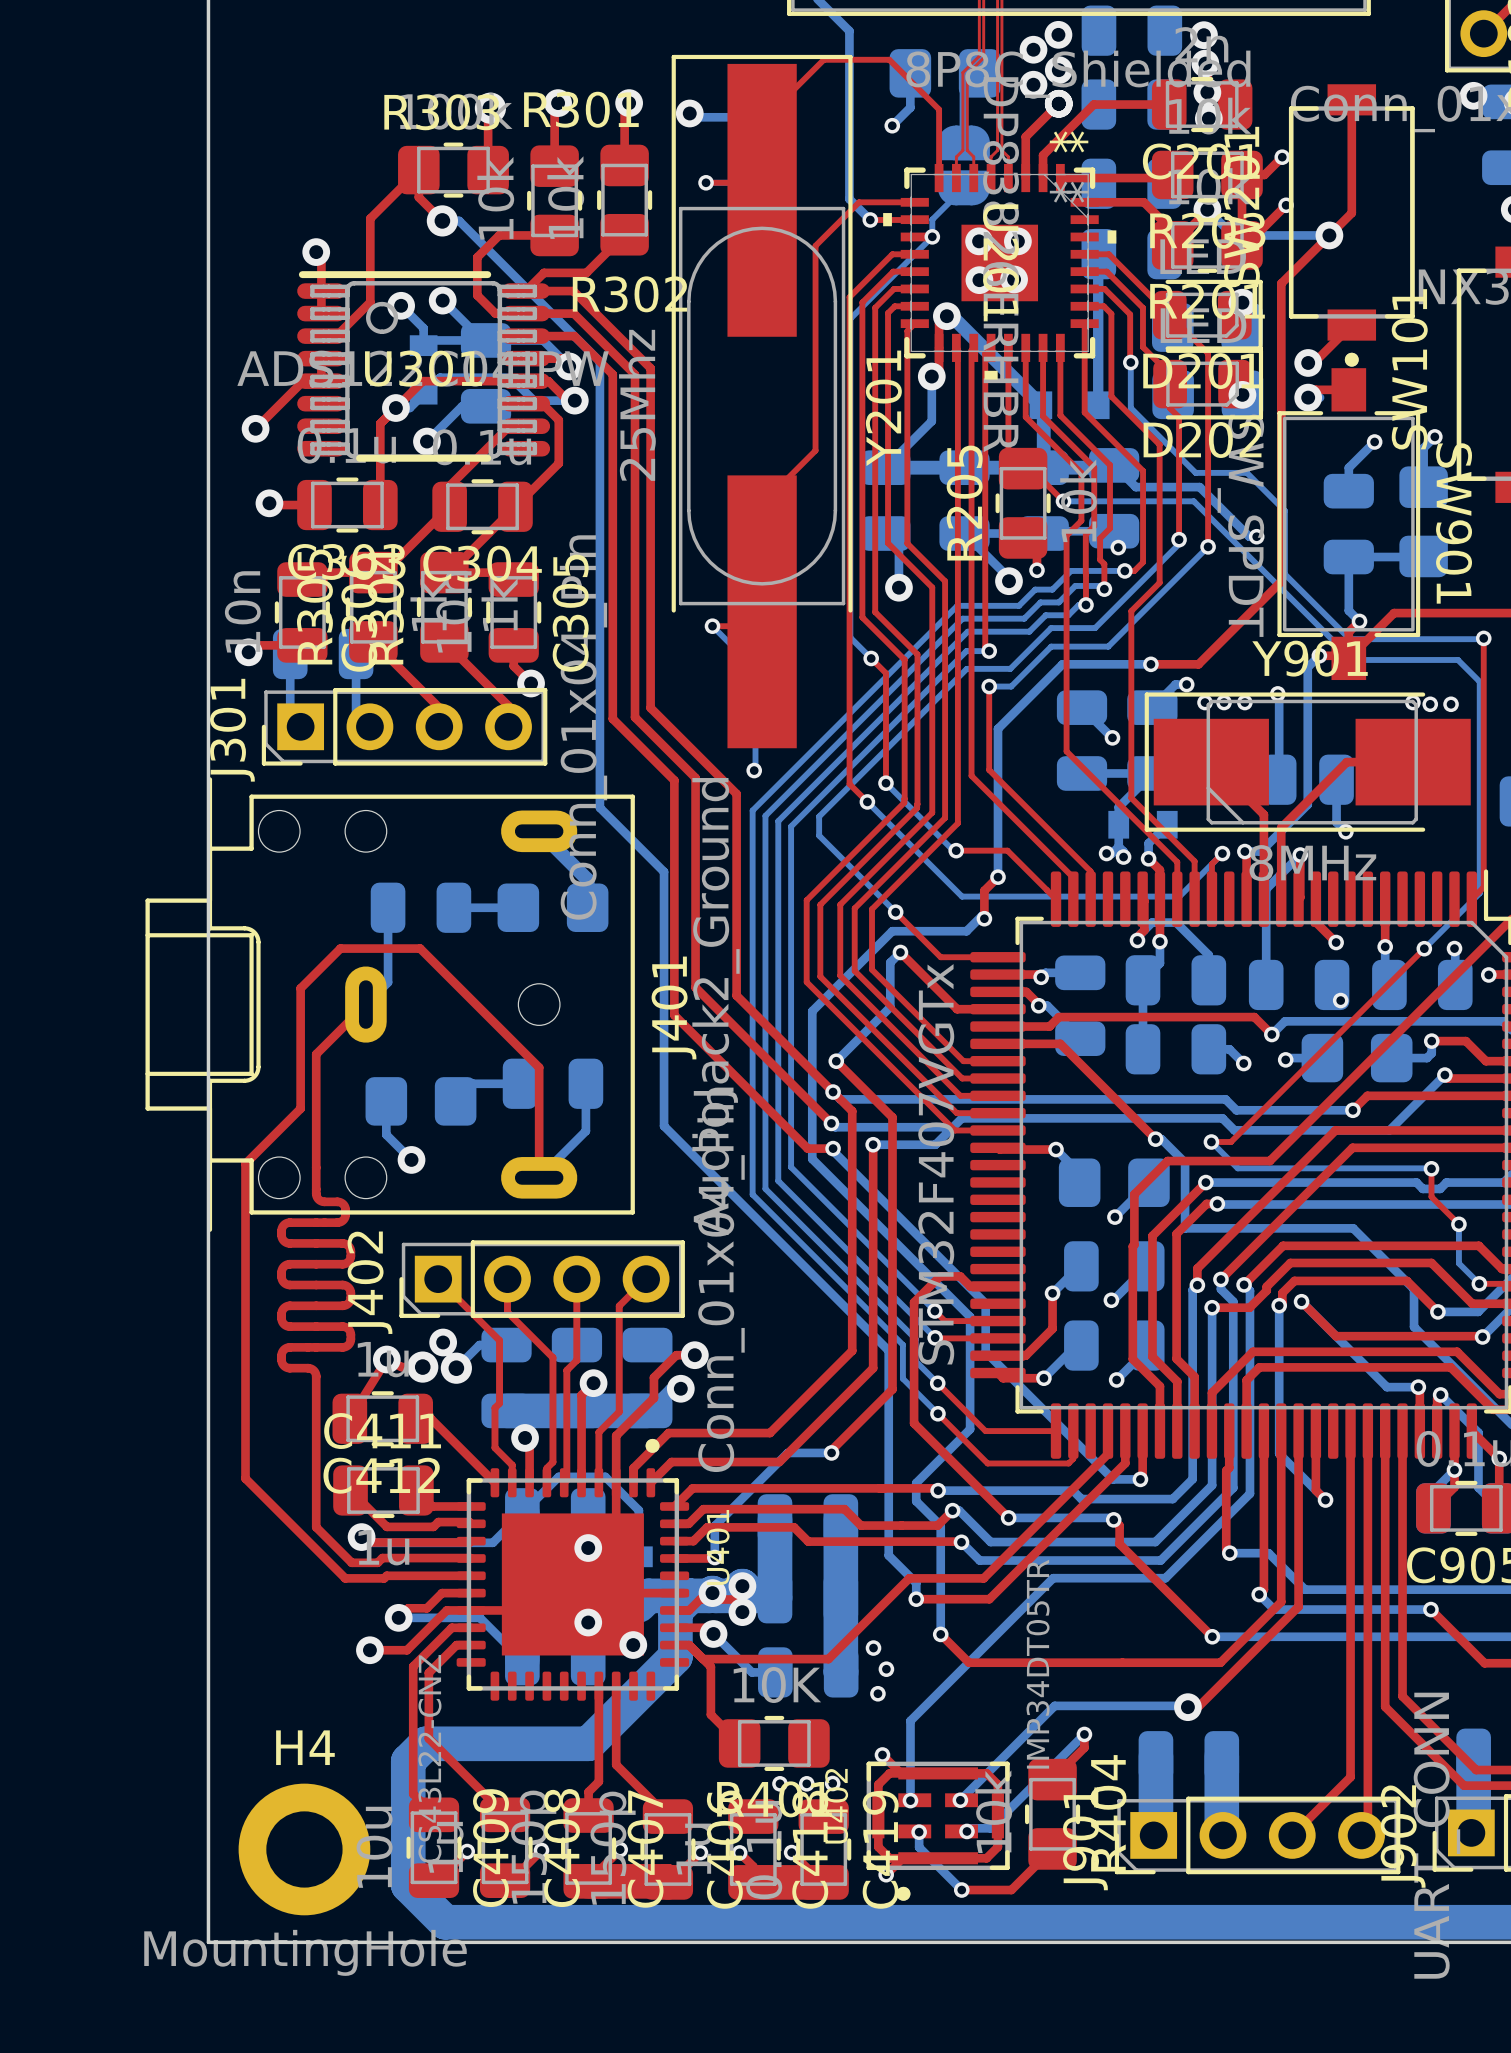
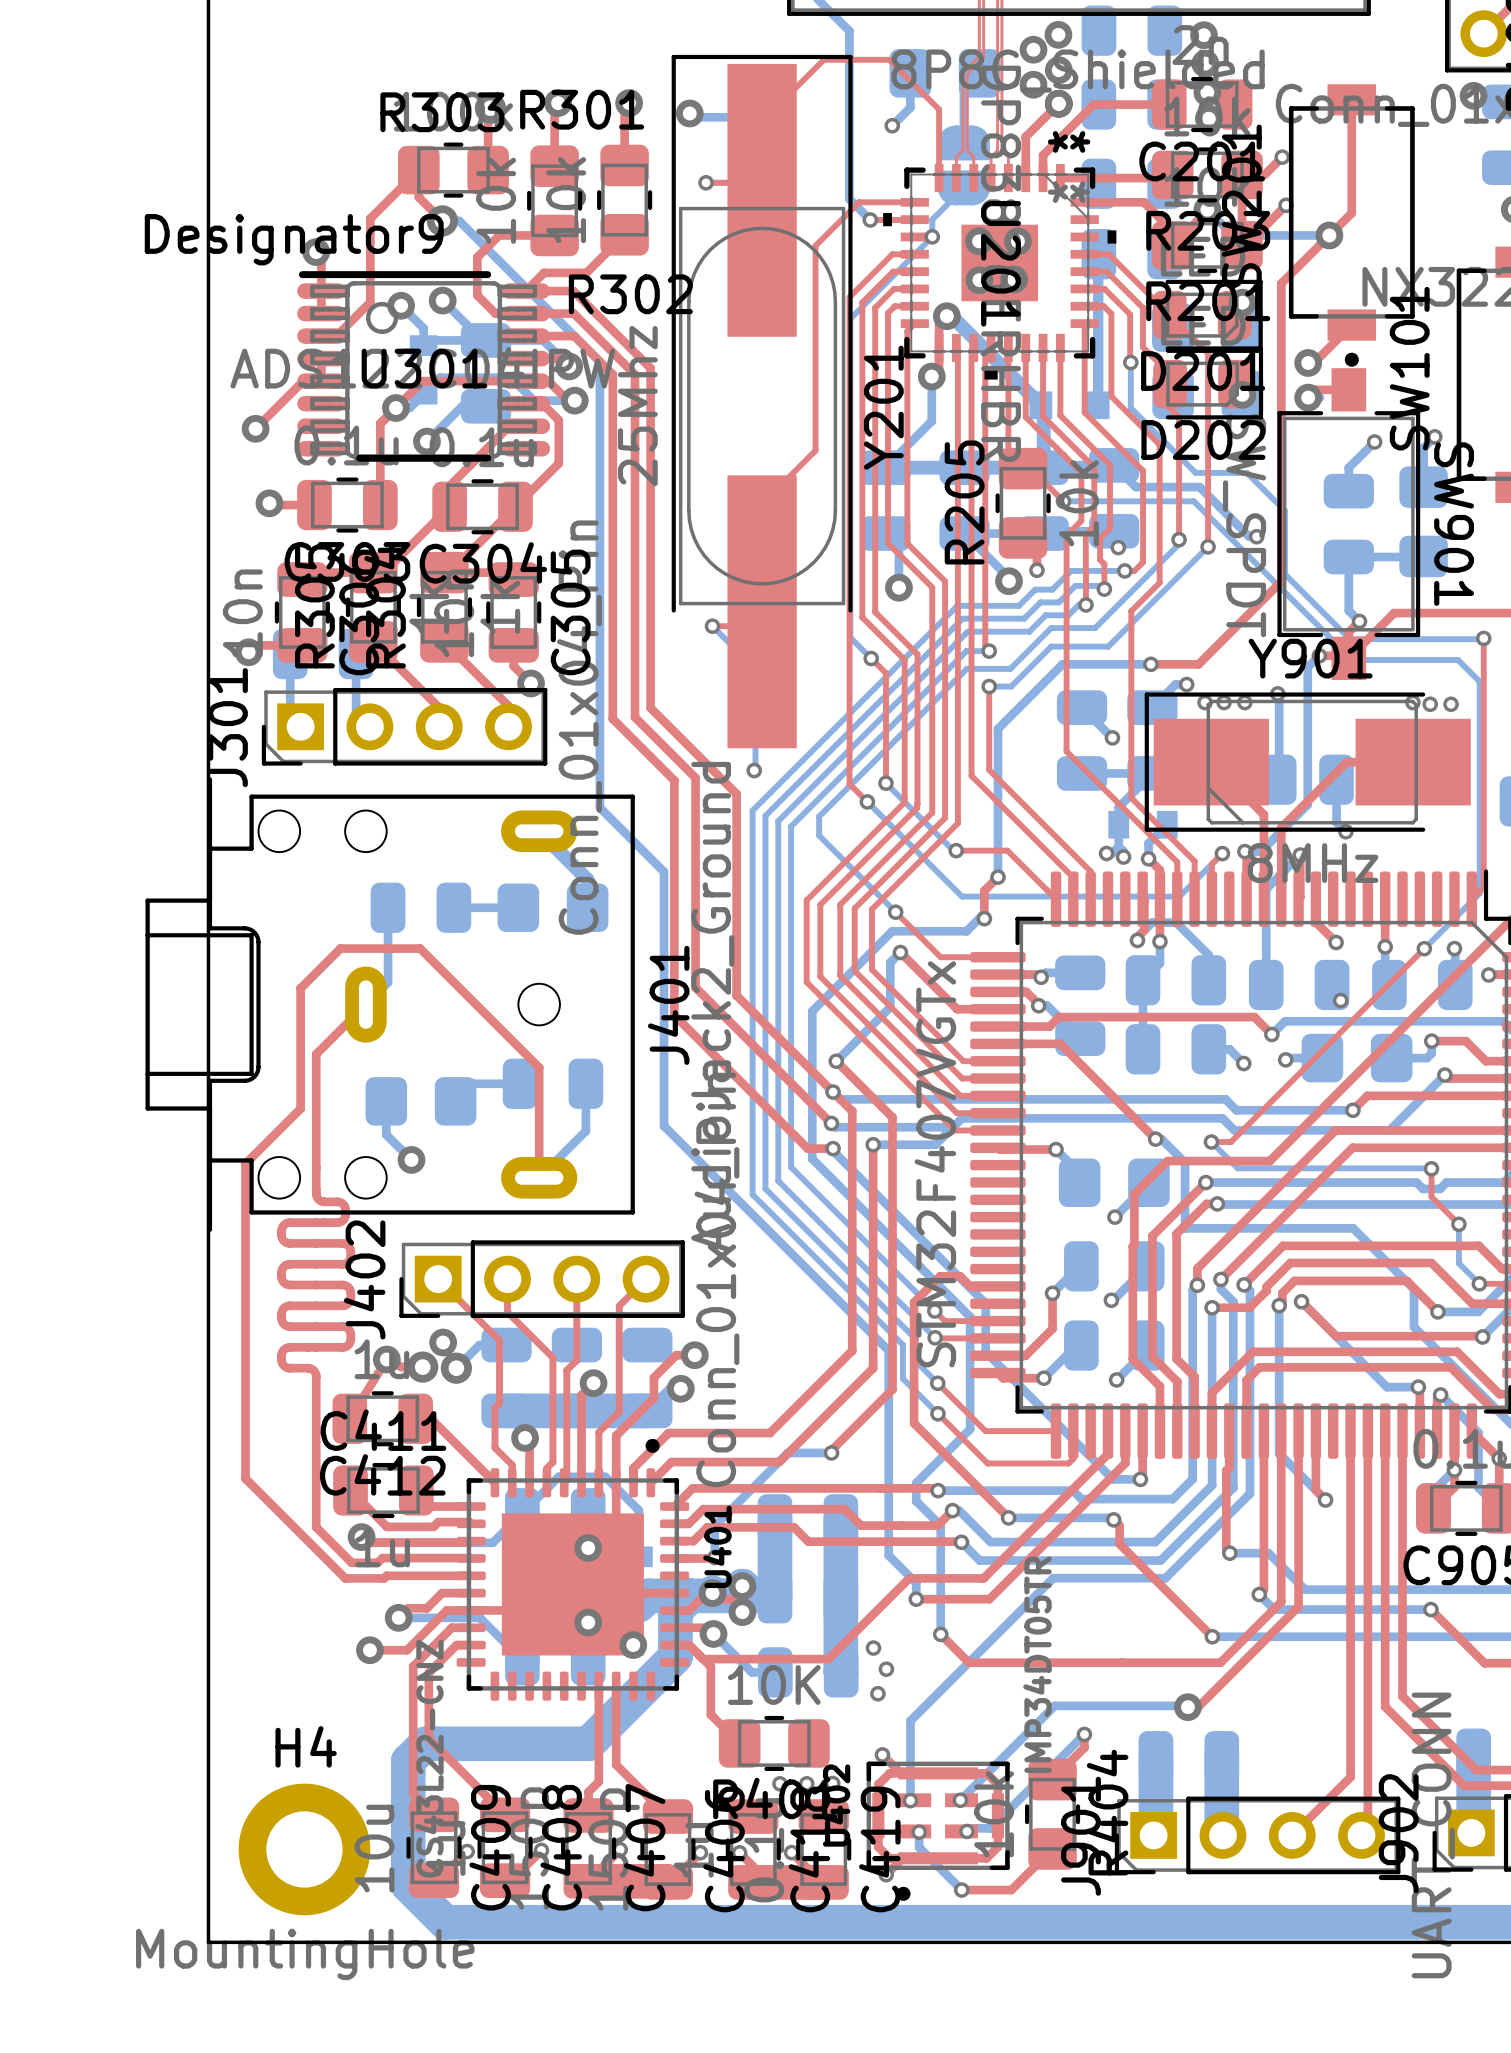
U301 text: none -> Designator9 (294, 239)

